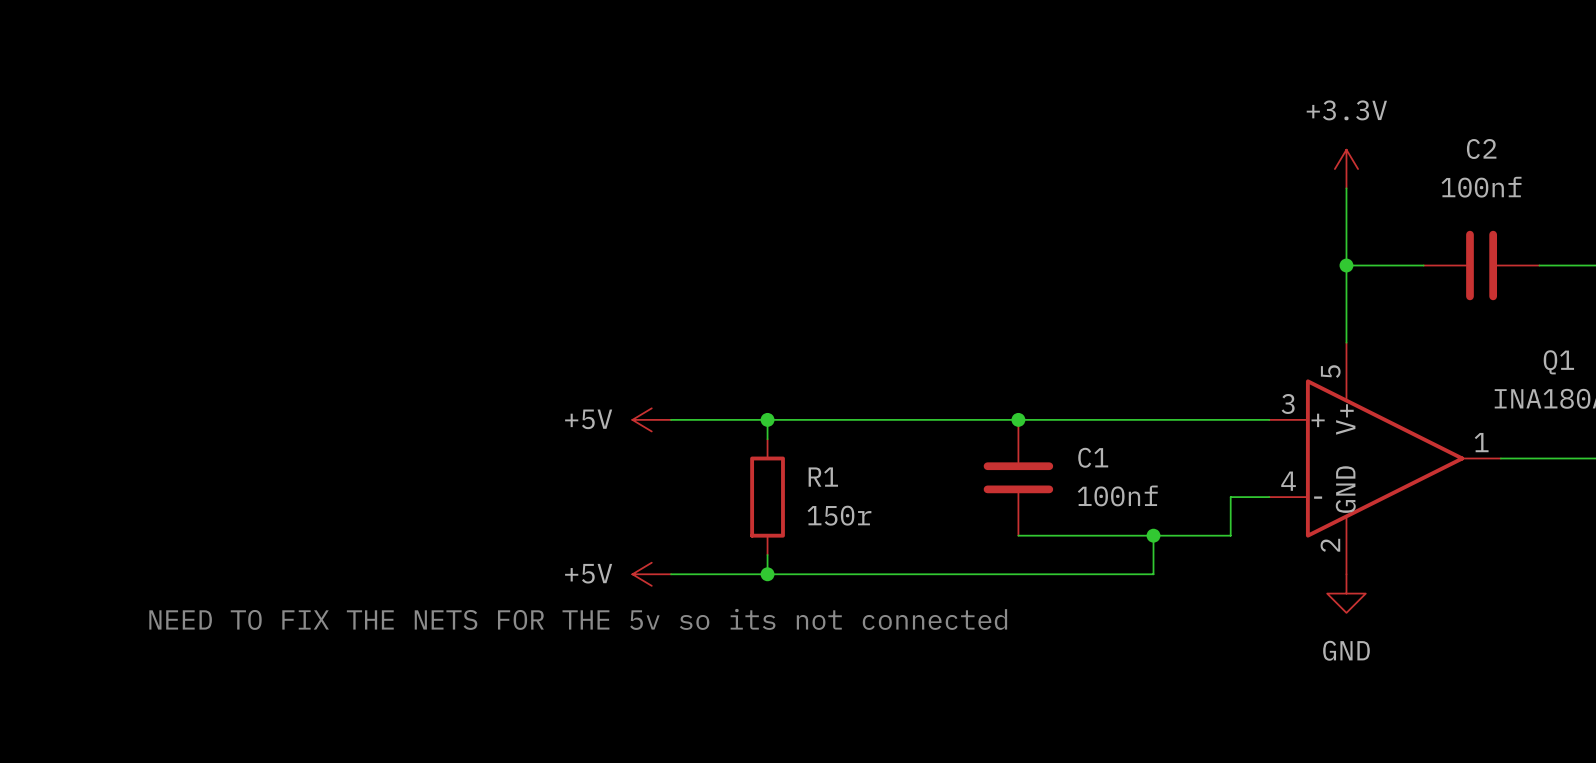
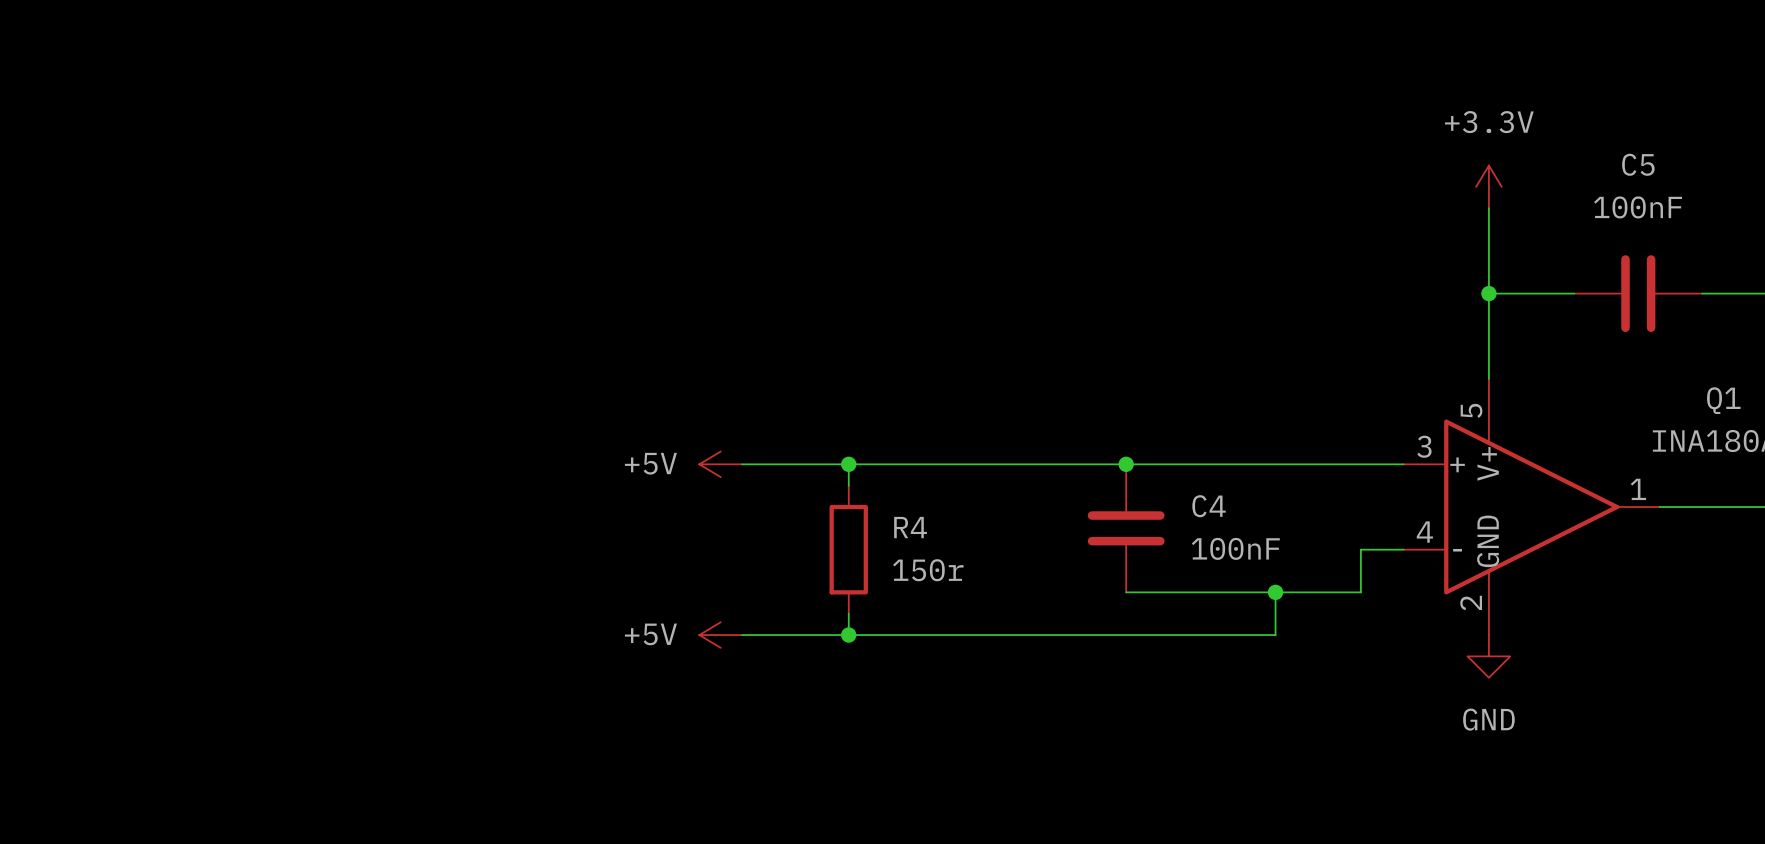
C2 name: C2 (1481, 149) -> C5 (1638, 164)
C2 value: 100nf (1481, 187) -> 100nF (1638, 207)
C1 name: C1 (1093, 457) -> C4 (1209, 506)
R1 name: R1 (823, 477) -> R4 (910, 527)
C1 value: 100nf (1117, 495) -> 100nF (1235, 548)
text: NEED TO FIX THE NETS FOR THE 5v so its not connected (578, 619) -> none

